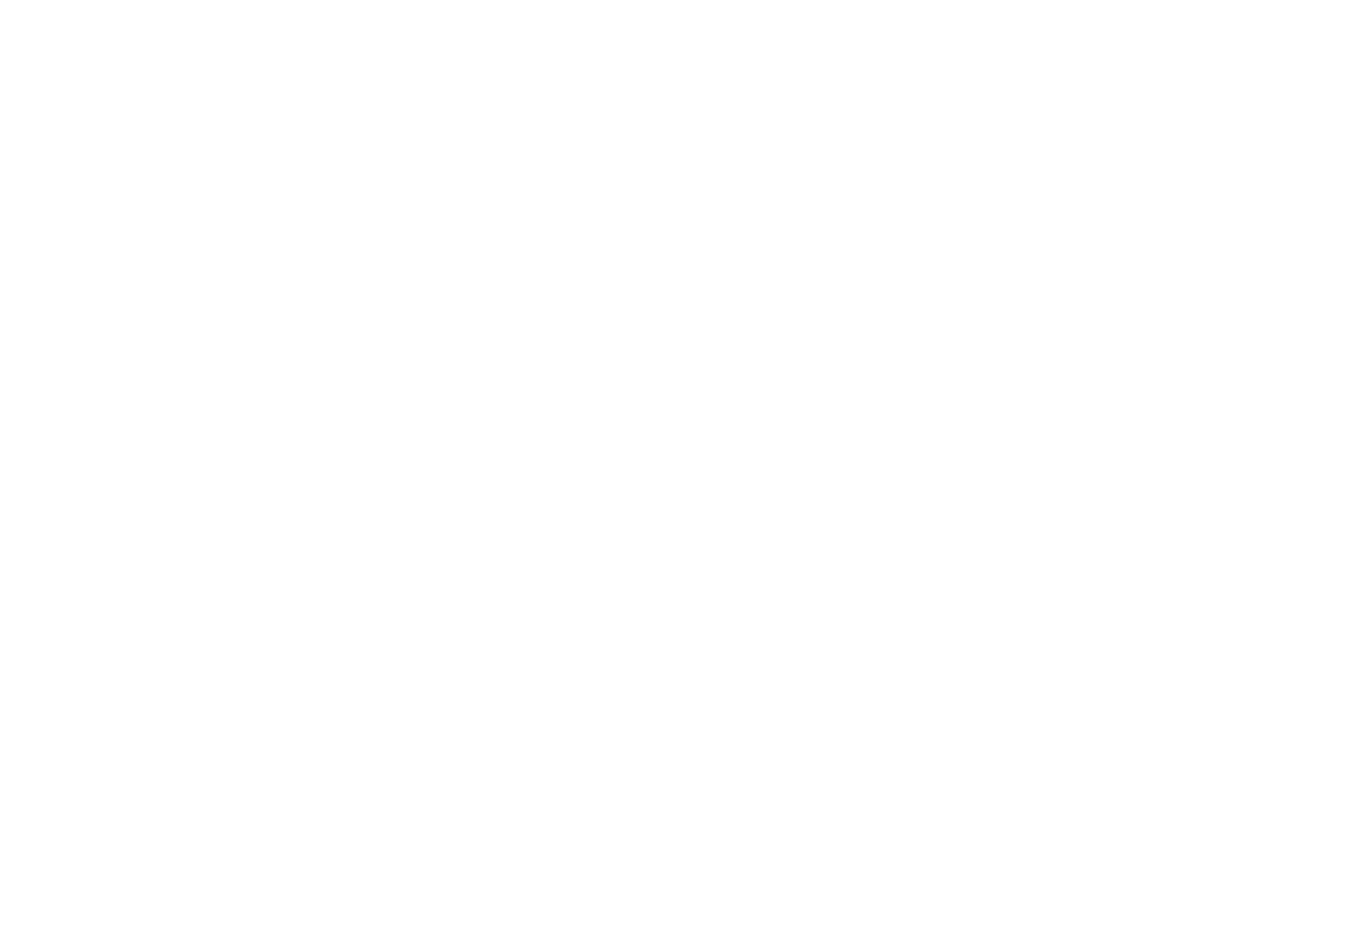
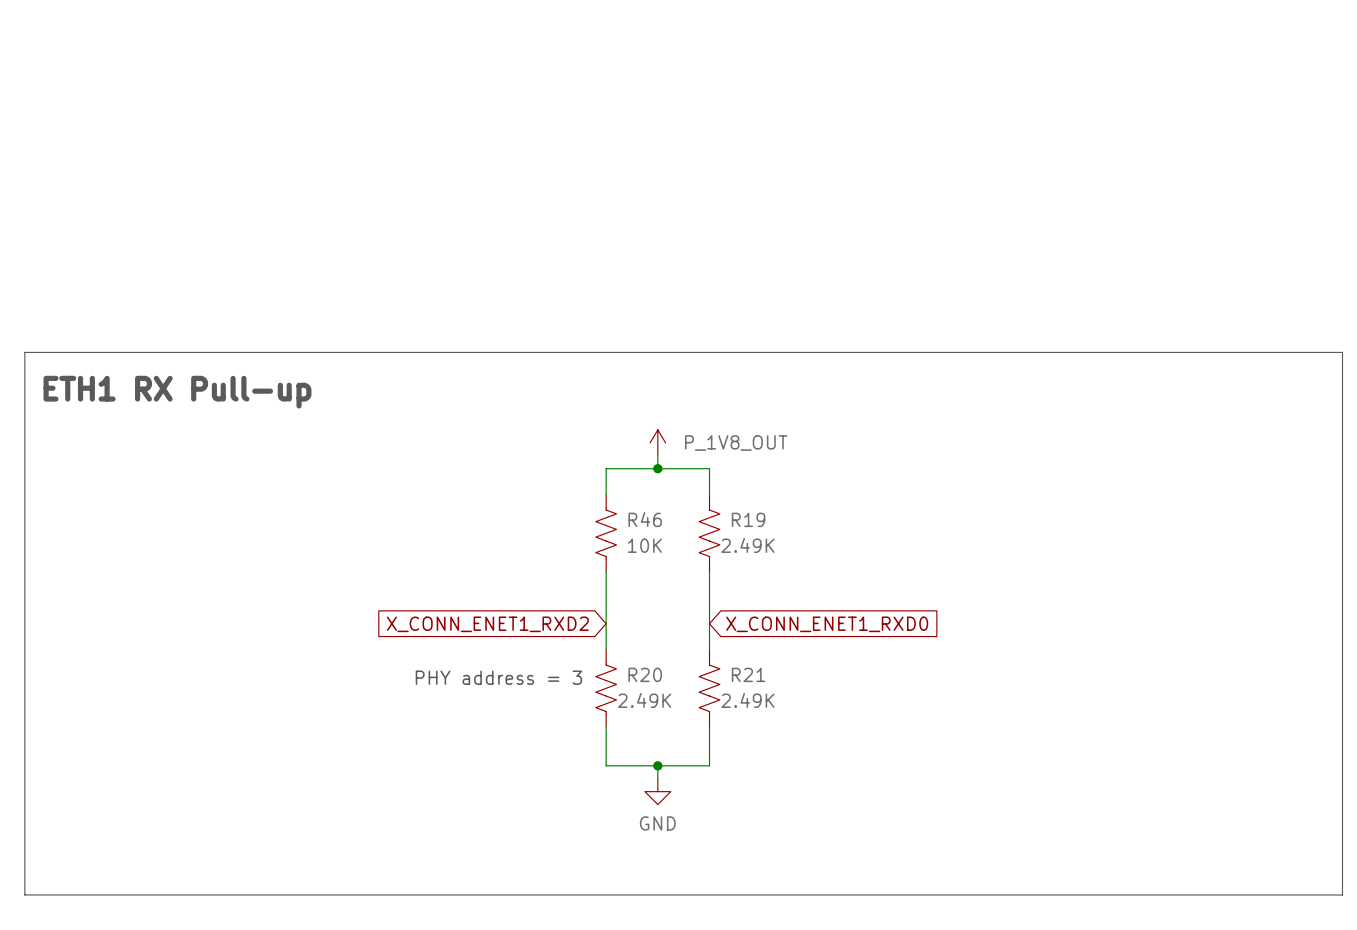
line: none -> (24, 352) (1342, 352) (1342, 894) (24, 894) (24, 352)
text: none -> ETH1 RX Pull-up (177, 392)
power symbol: none -> P_1V8_OUT (657, 442)
wire: none -> (657, 455) (657, 468)
junction: none -> (657, 468)
wire: none -> (606, 494) (606, 468) (709, 468) (709, 494)
R46: none -> 10K (606, 533)
R19: none -> 2.49K (709, 533)
wire: none -> (606, 572) (606, 649)
wire: none -> (709, 572) (709, 649)
global label: none -> X_CONN_ENET1_RXD2 (487, 624)
global label: none -> X_CONN_ENET1_RXD0 (827, 624)
text: none -> PHY address = 3 (498, 677)
R20: none -> 2.49K (606, 688)
R21: none -> 2.49K (709, 688)
wire: none -> (606, 727) (606, 765) (709, 765) (709, 727)
wire: none -> (657, 765) (657, 778)
junction: none -> (657, 765)
power symbol: none -> GND (657, 791)

